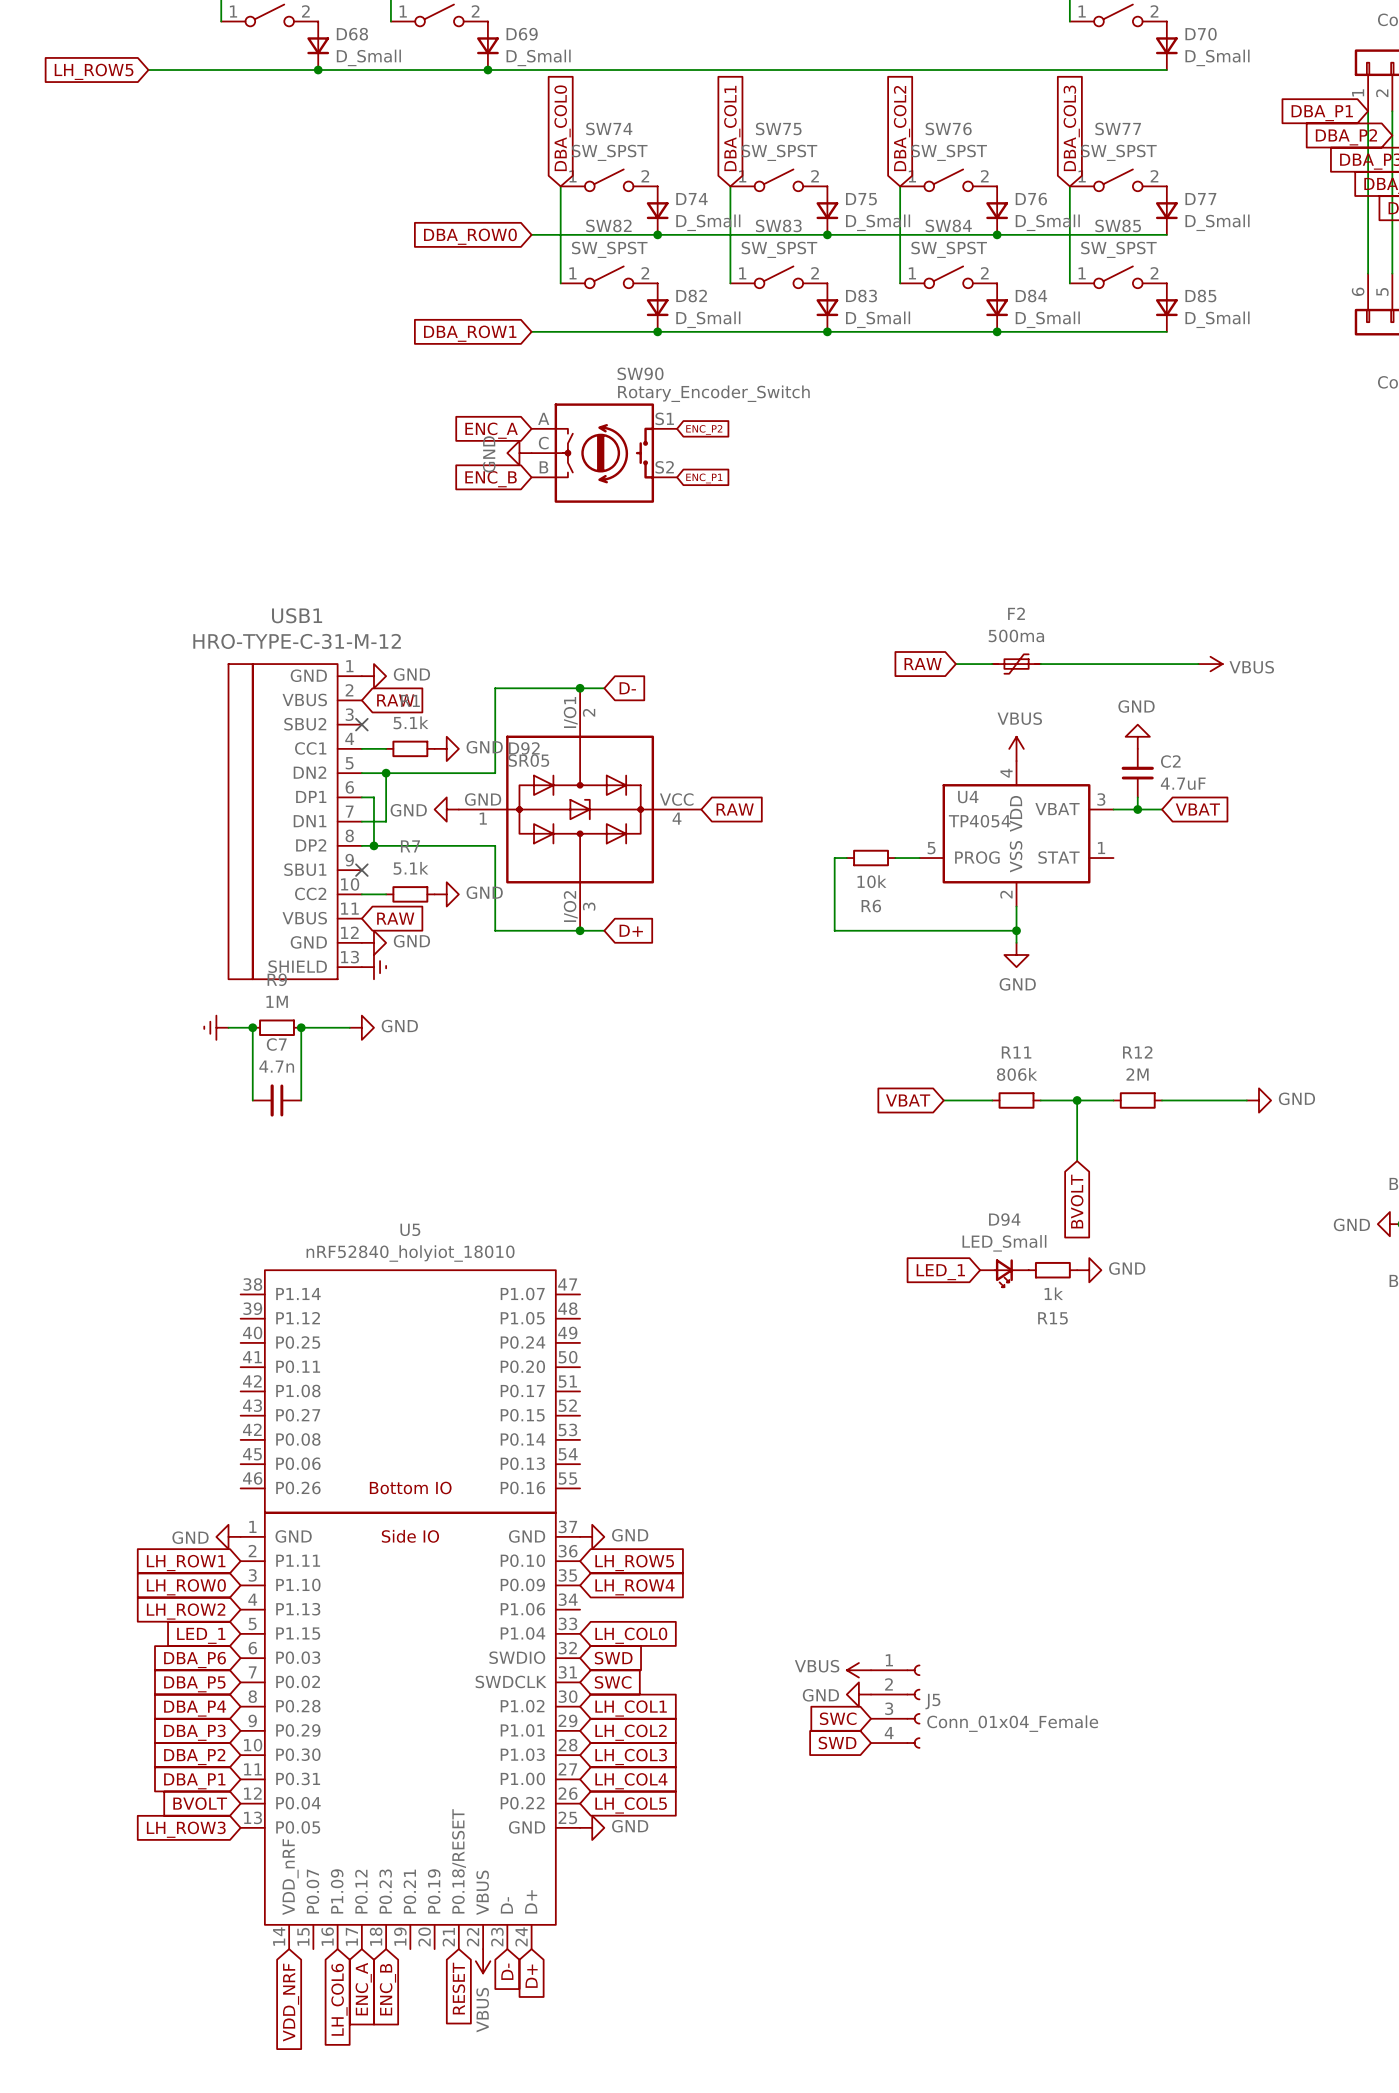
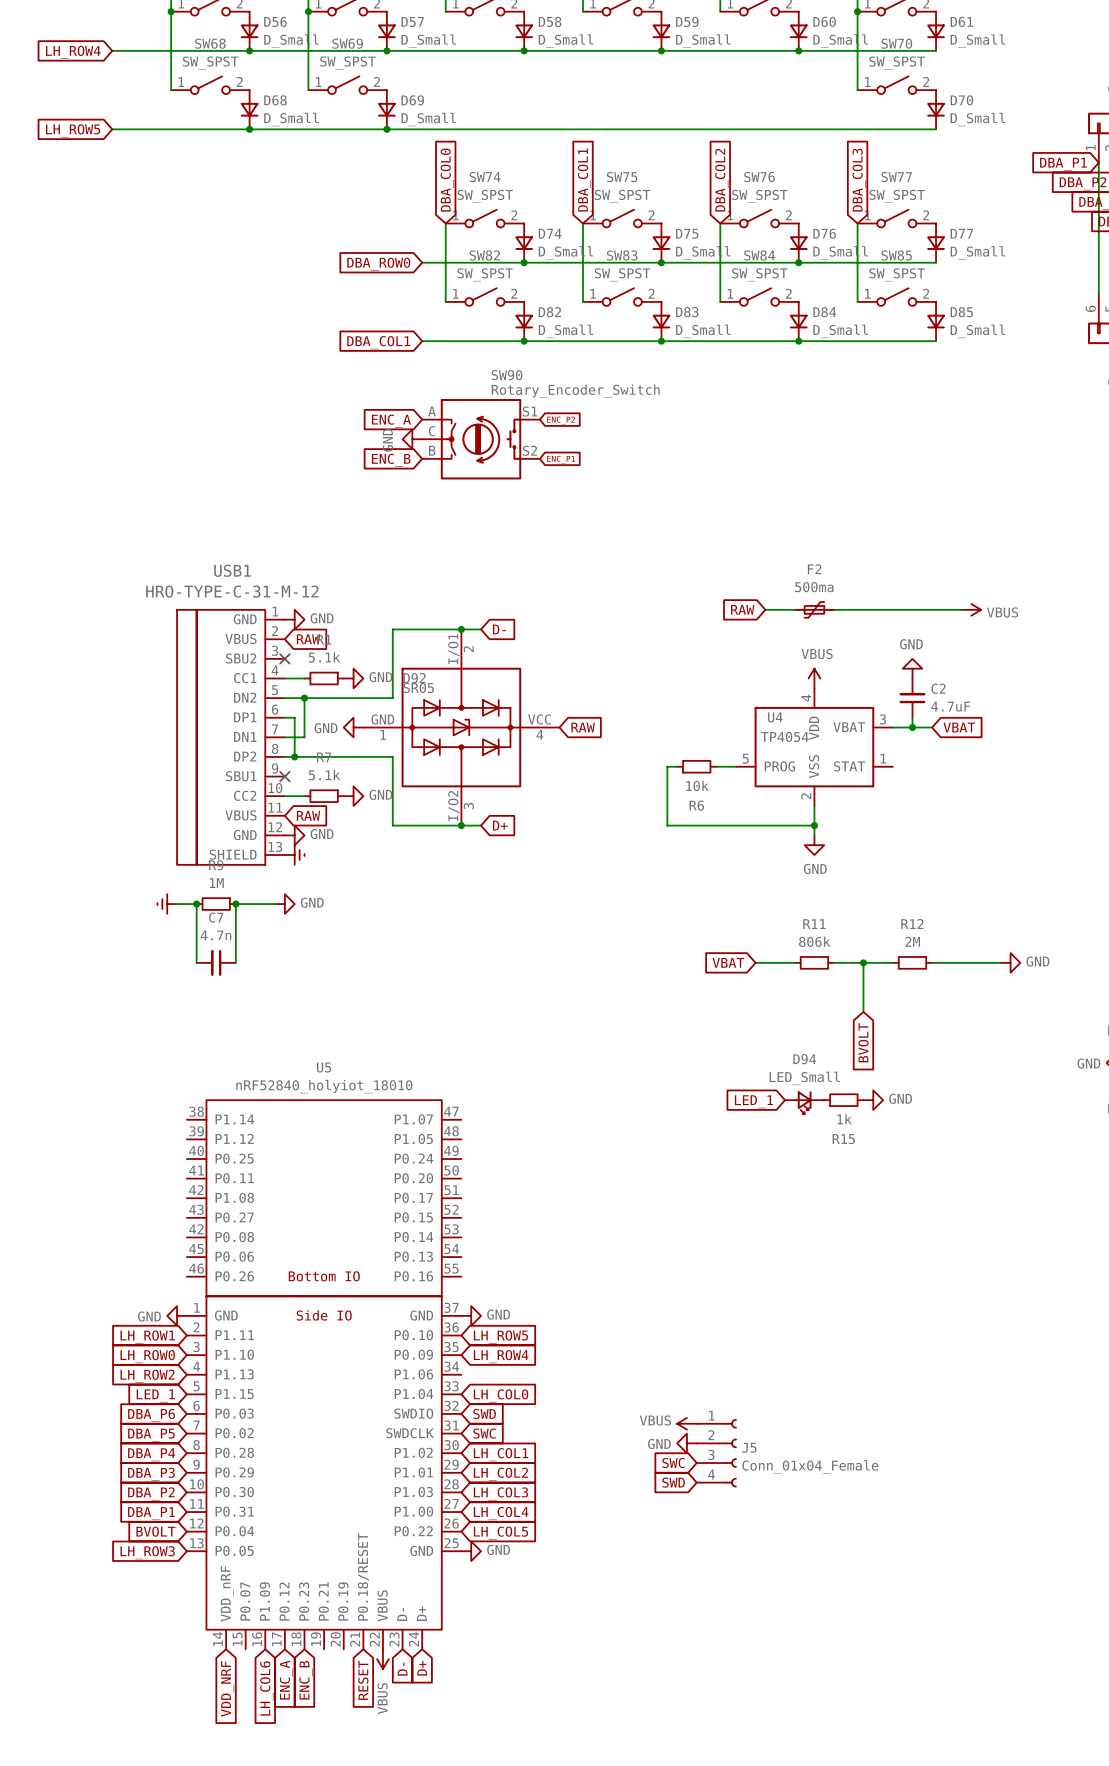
global label: DBA_ROW1 (470, 333) -> DBA_COL1 (378, 342)

